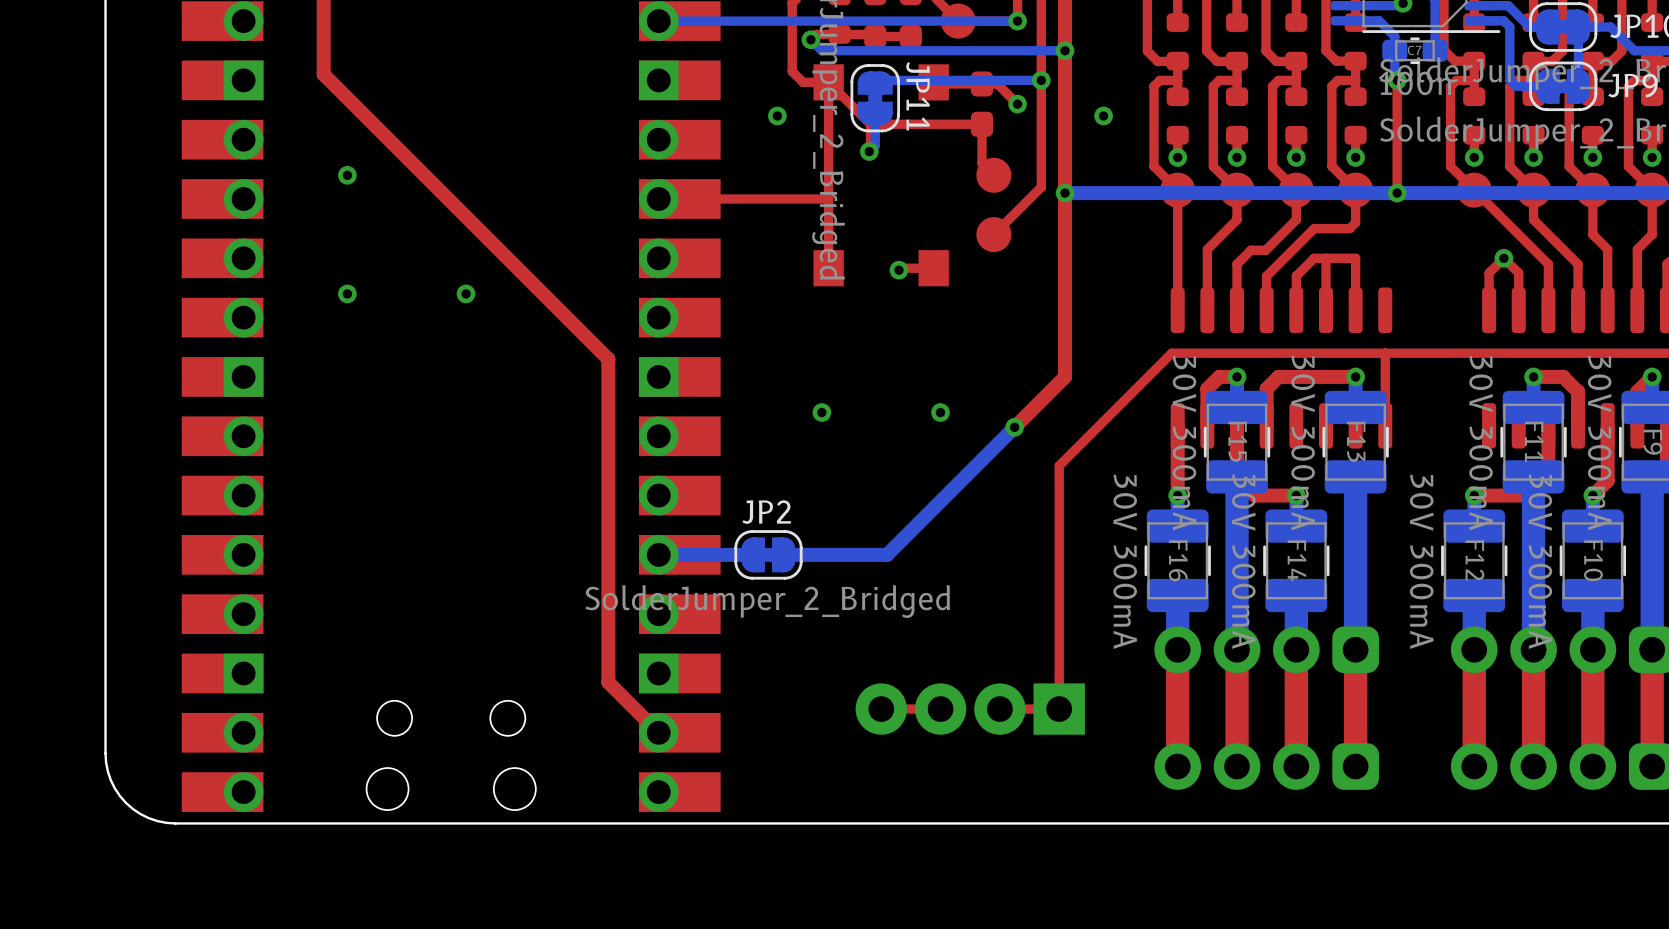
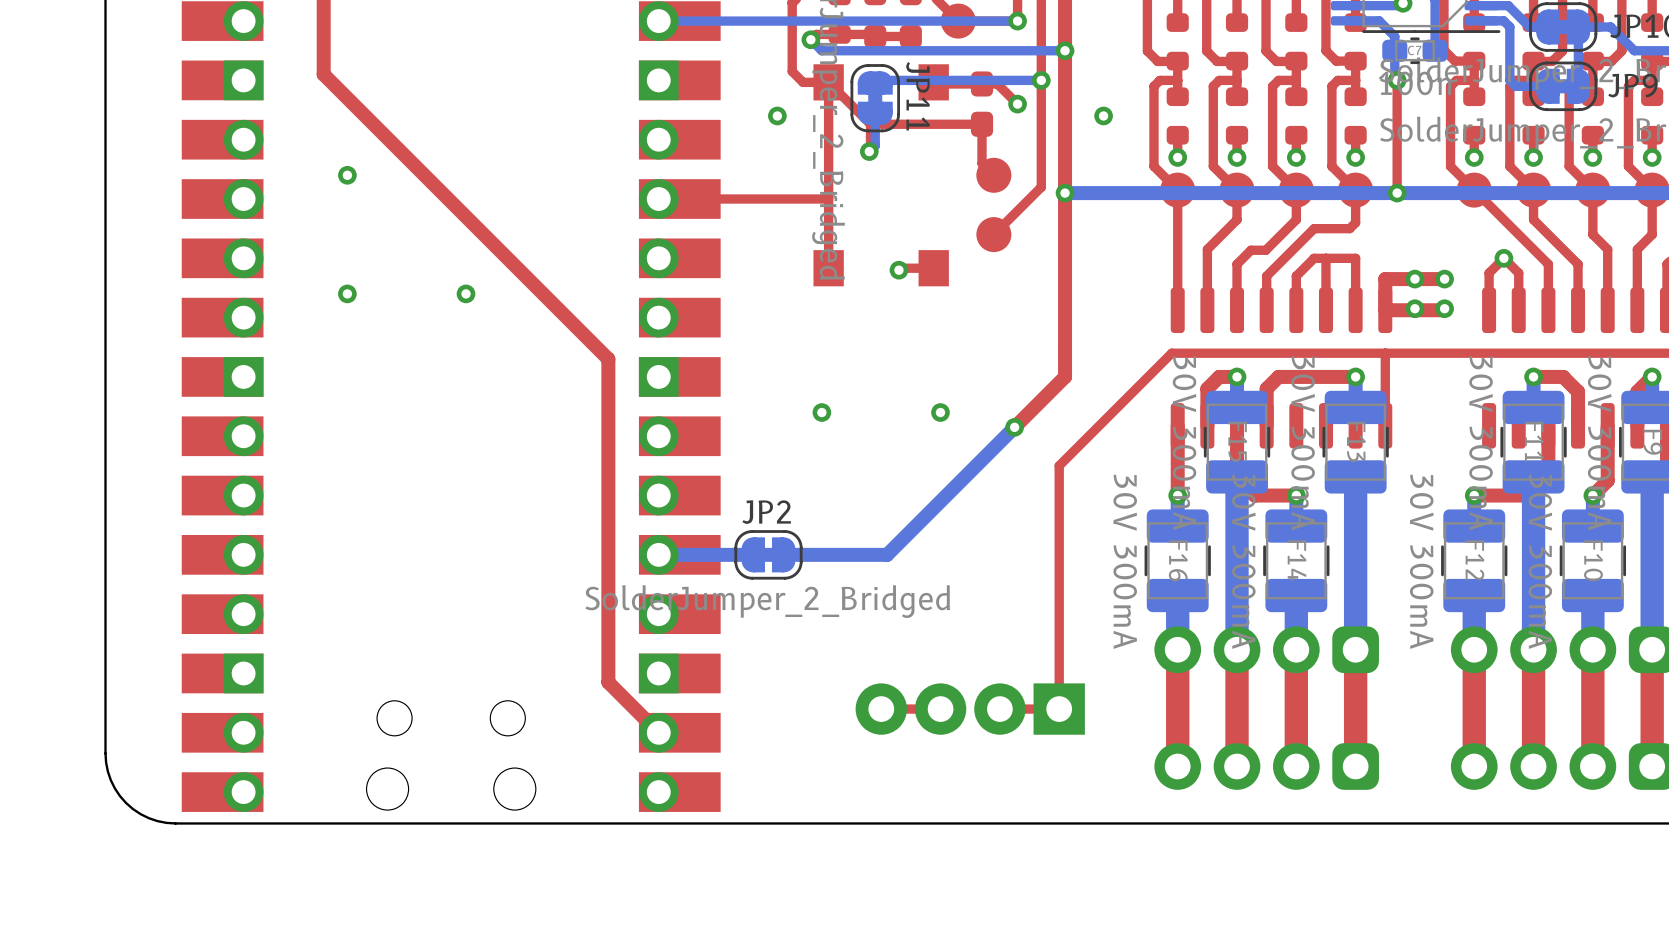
via: none -> (1414, 279)
top track: none -> (1444, 279) (1385, 279) (1385, 310) (1444, 308)
via: none -> (1444, 279)
via: none -> (1414, 308)
via: none -> (1444, 308)

